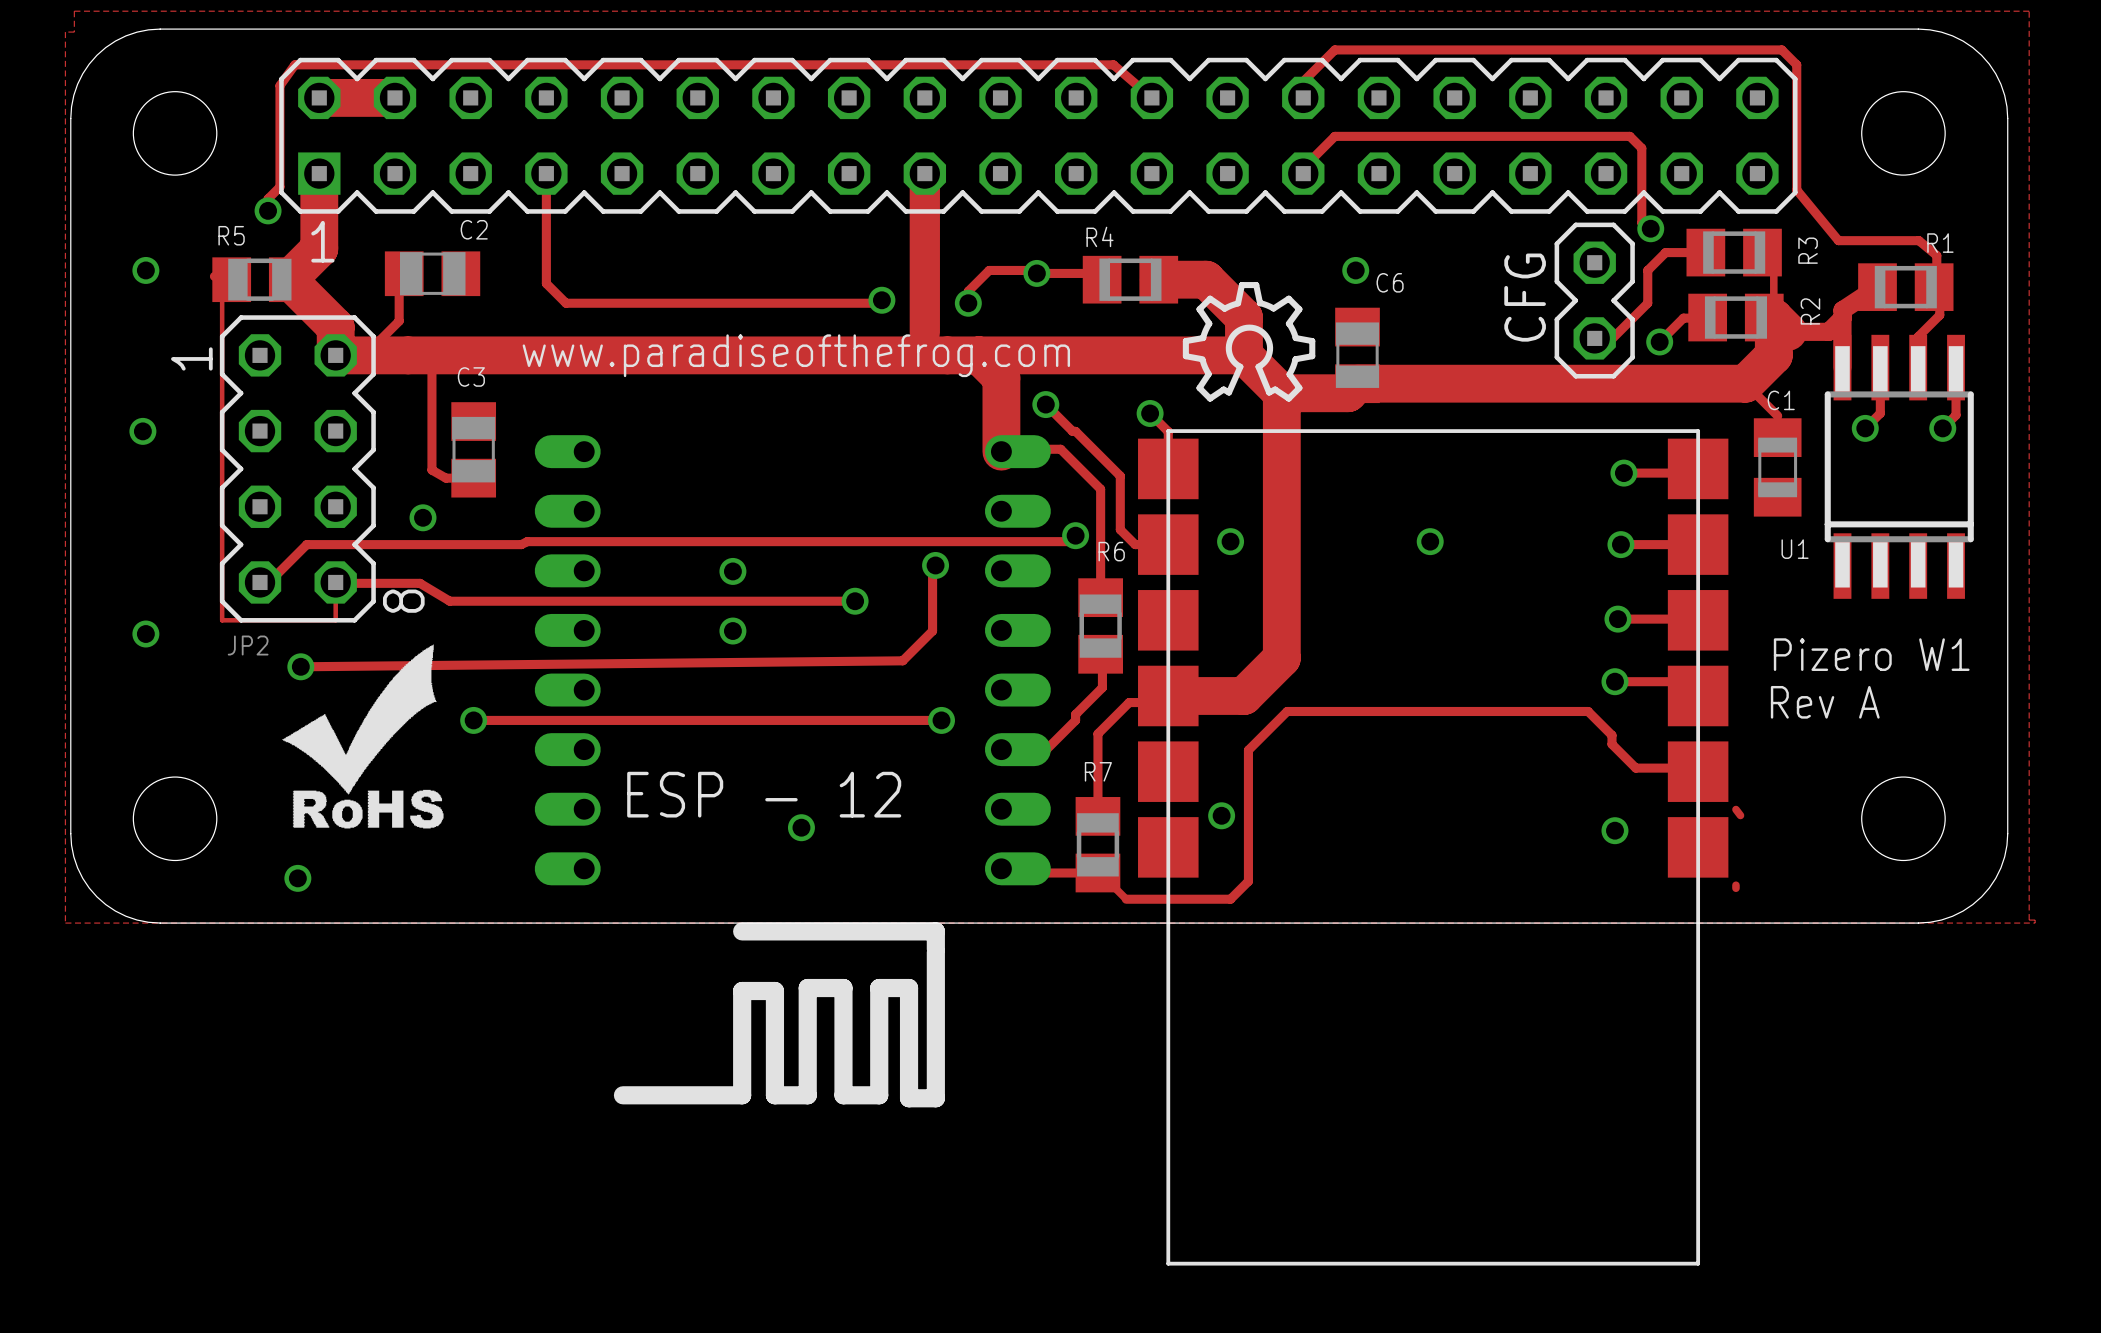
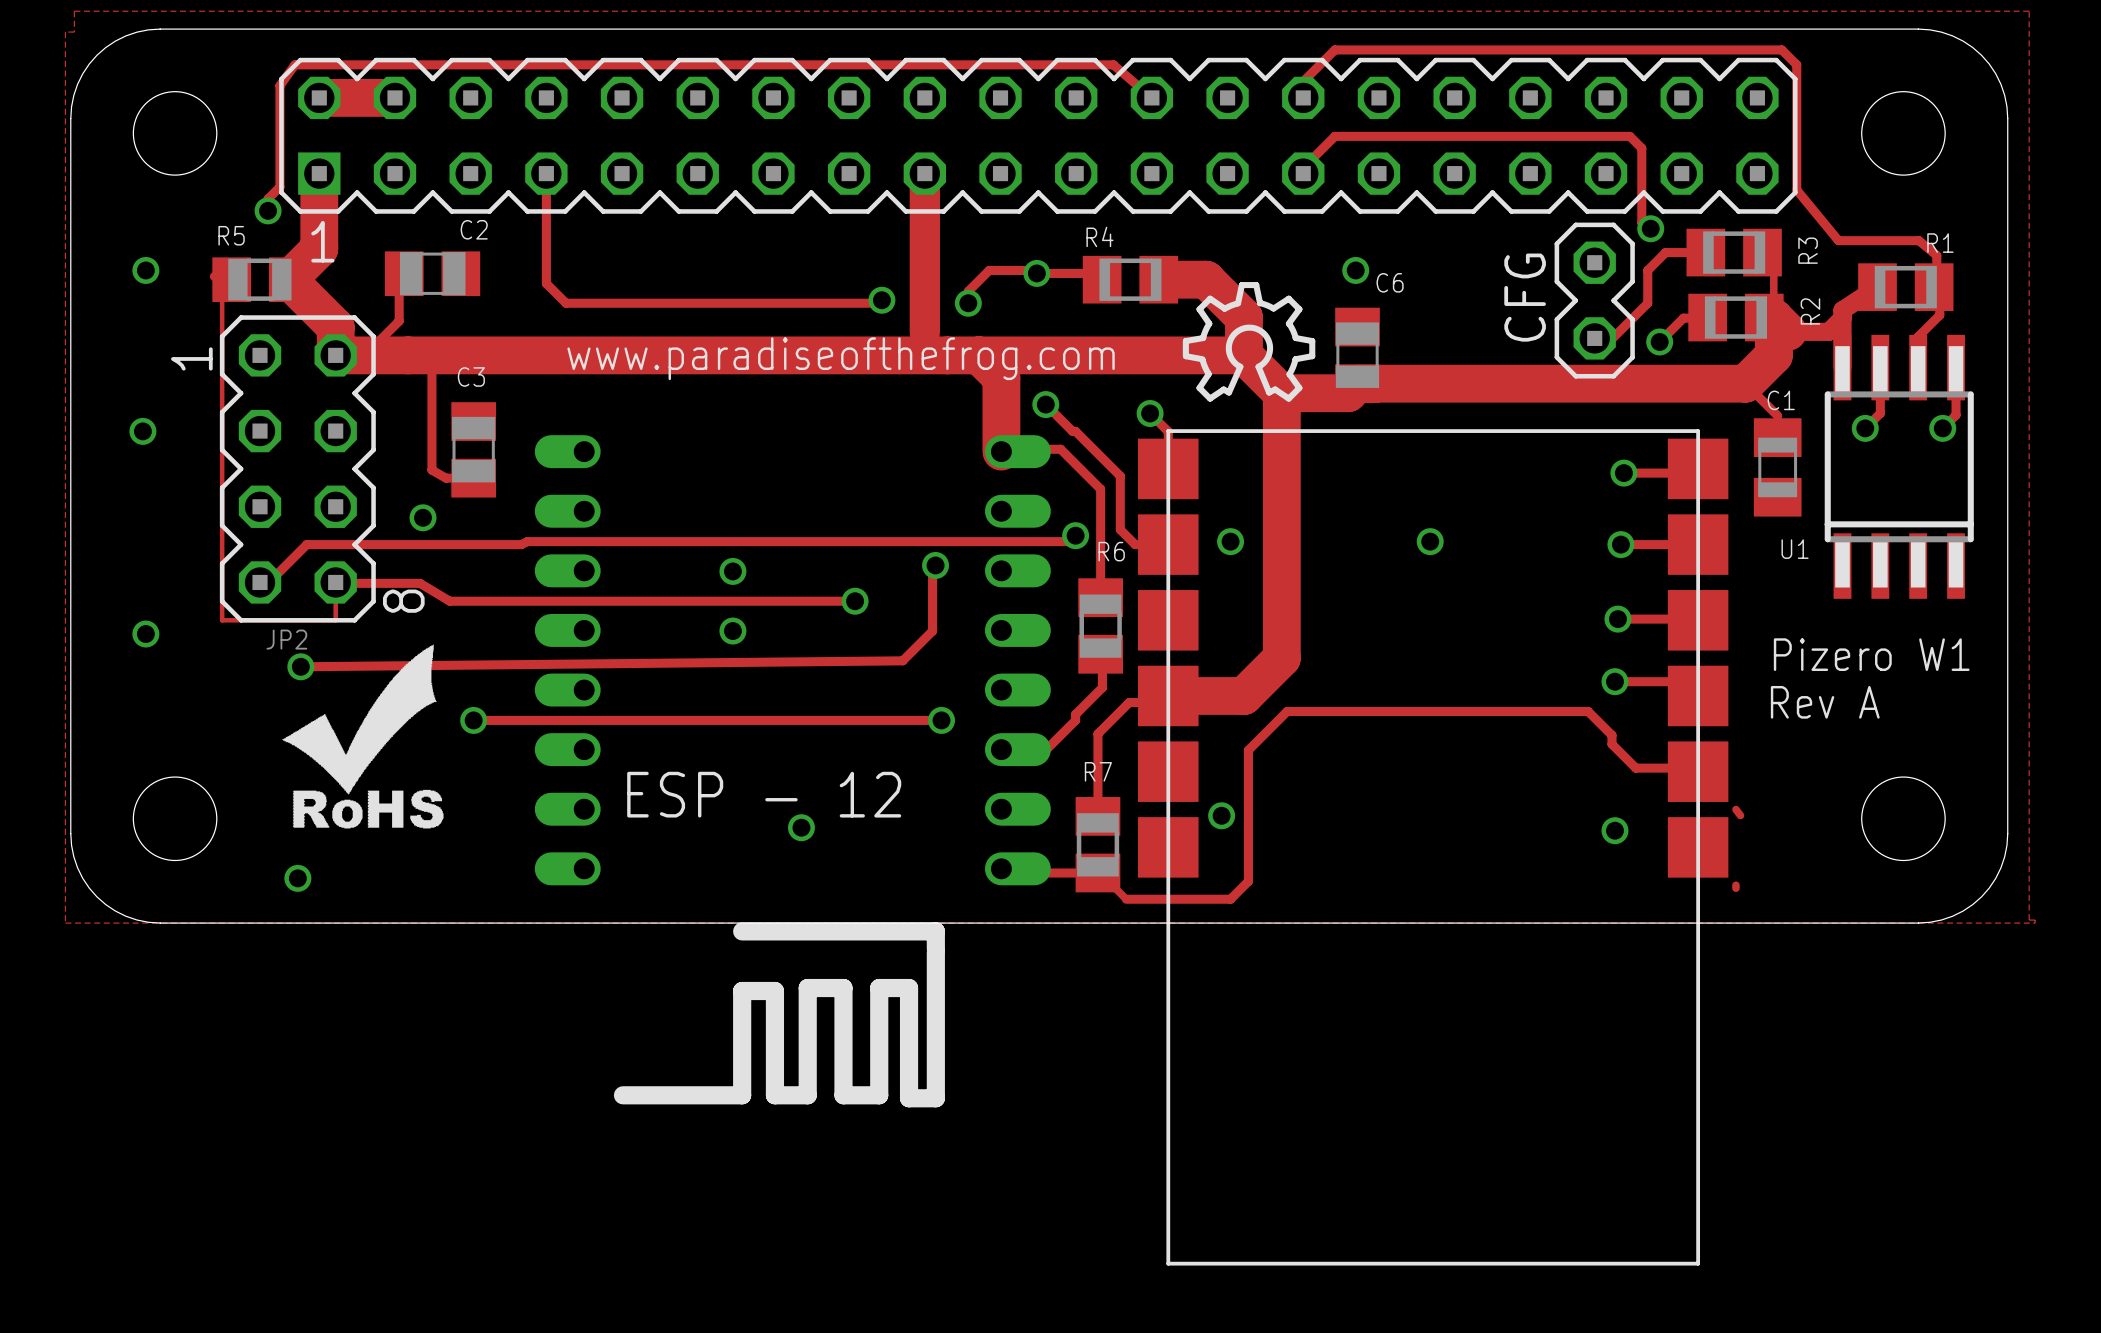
text position: www.paradiseofthefrog.com (796, 355) -> www.paradiseofthefrog.com (841, 358)
part value position: JP2 (248, 645) -> JP2 (286, 639)

